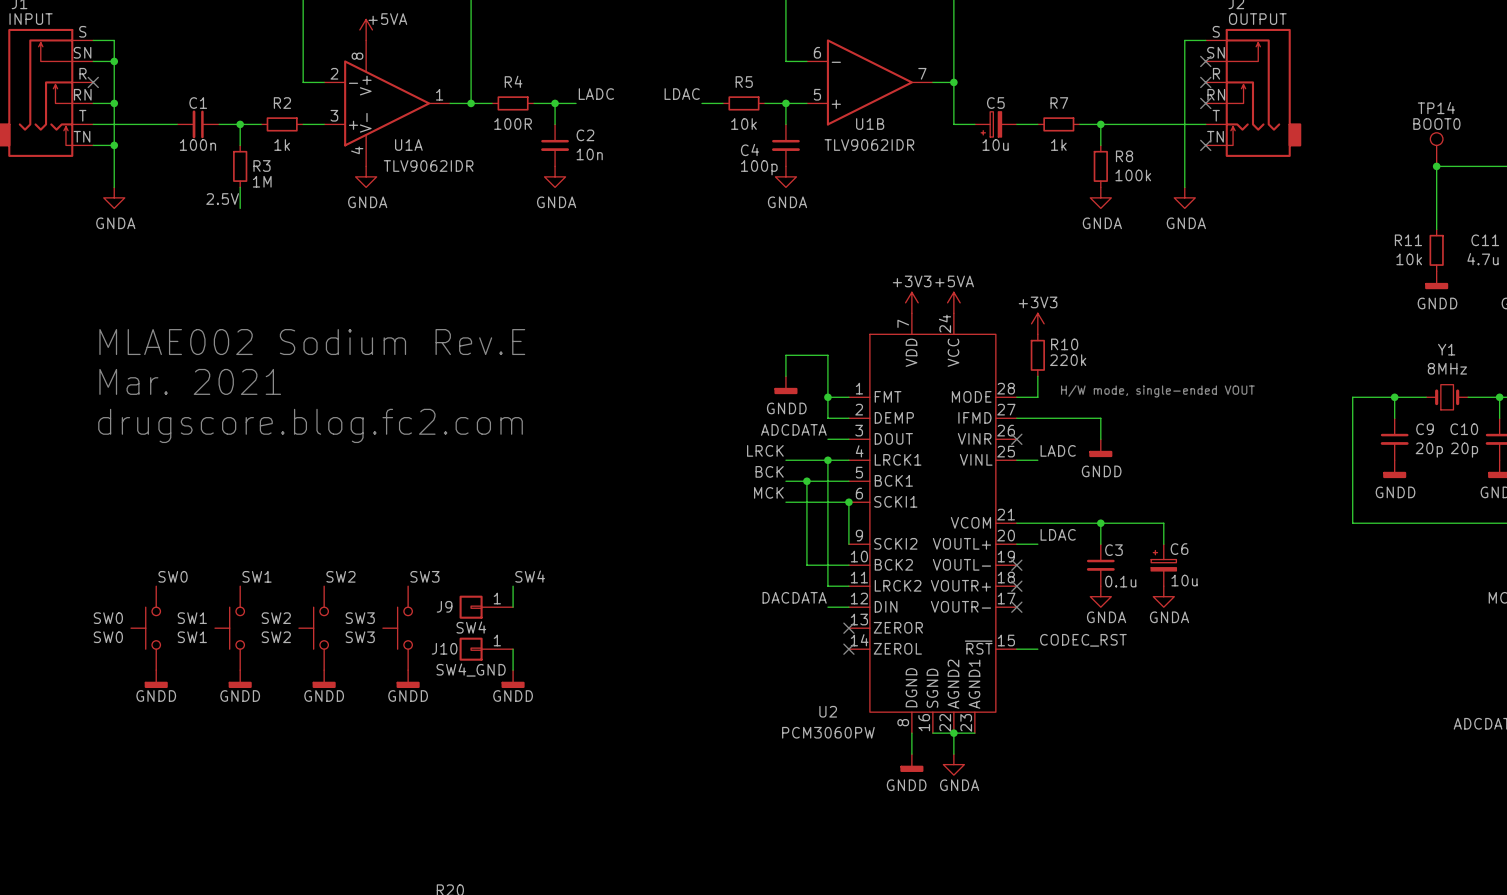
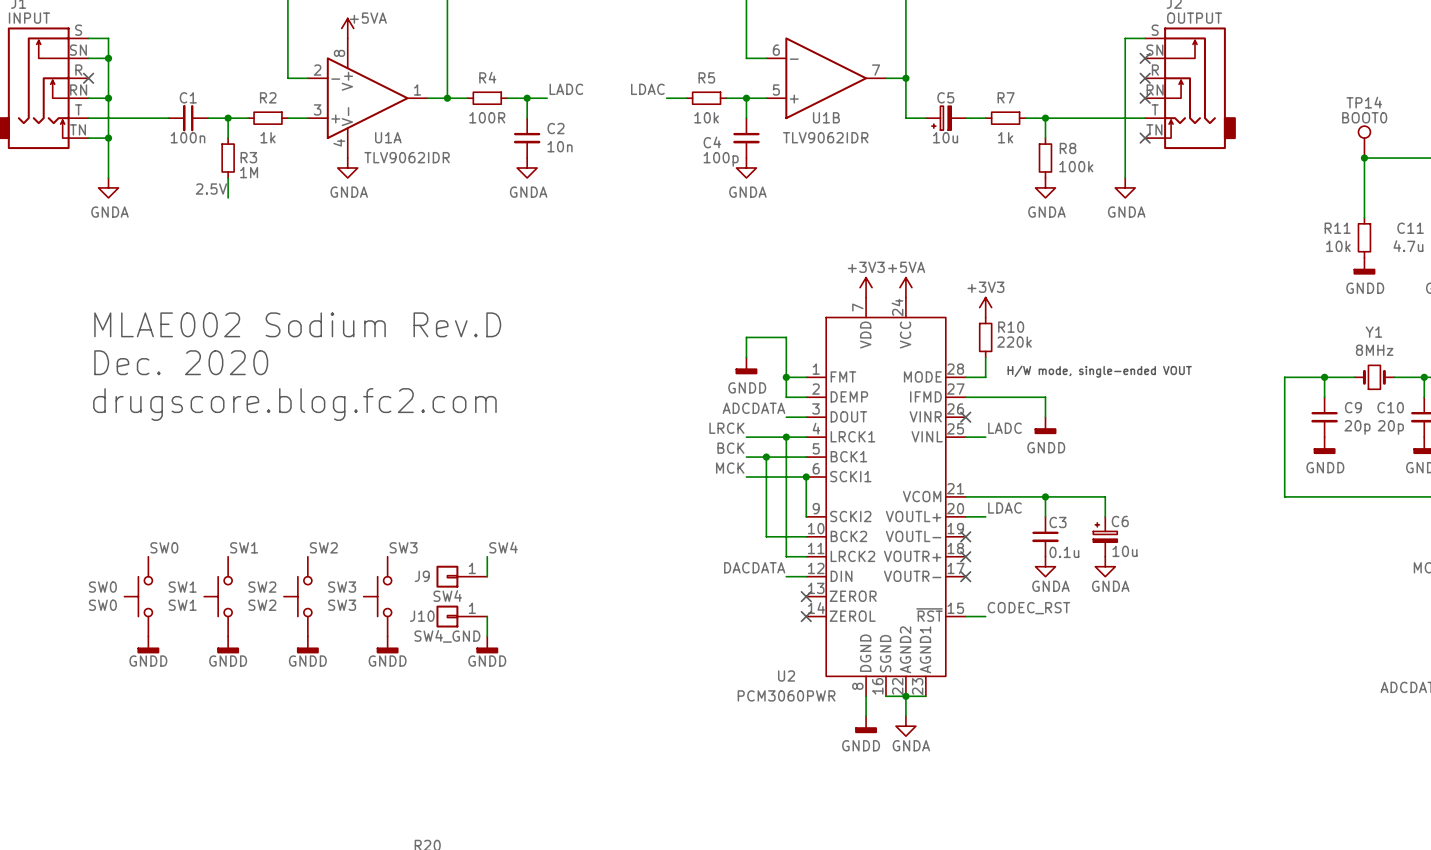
text: MLAE002 Sodium Rev.E (312, 342) -> MLAE002 Sodium Rev.D (297, 324)
text: Mar. 2021 (190, 381) -> Dec. 2020 (181, 362)
U2 value: PCM3060PW (828, 732) -> PCM3060PWR (786, 695)

